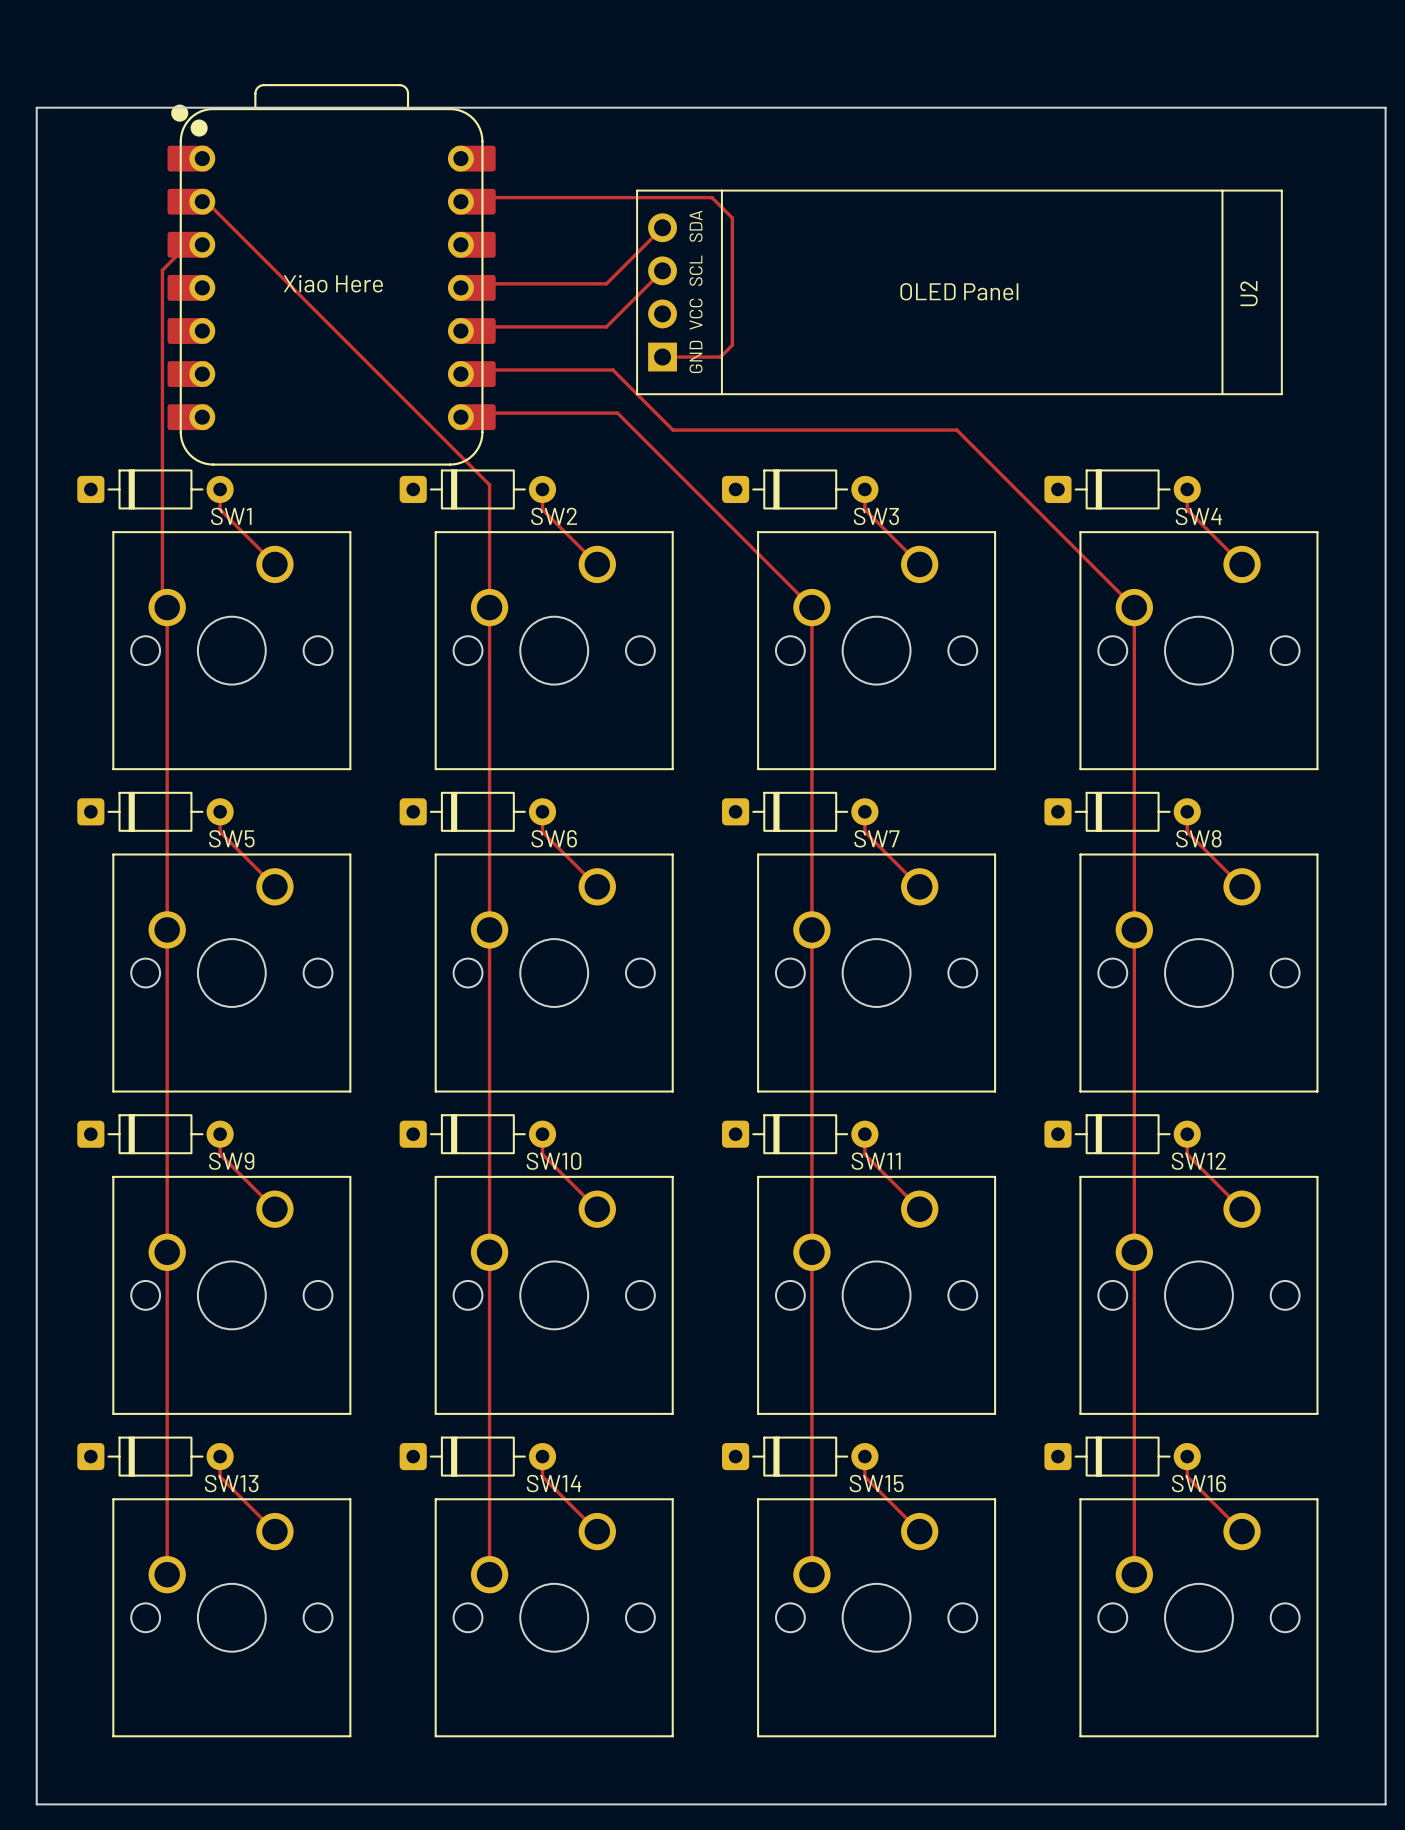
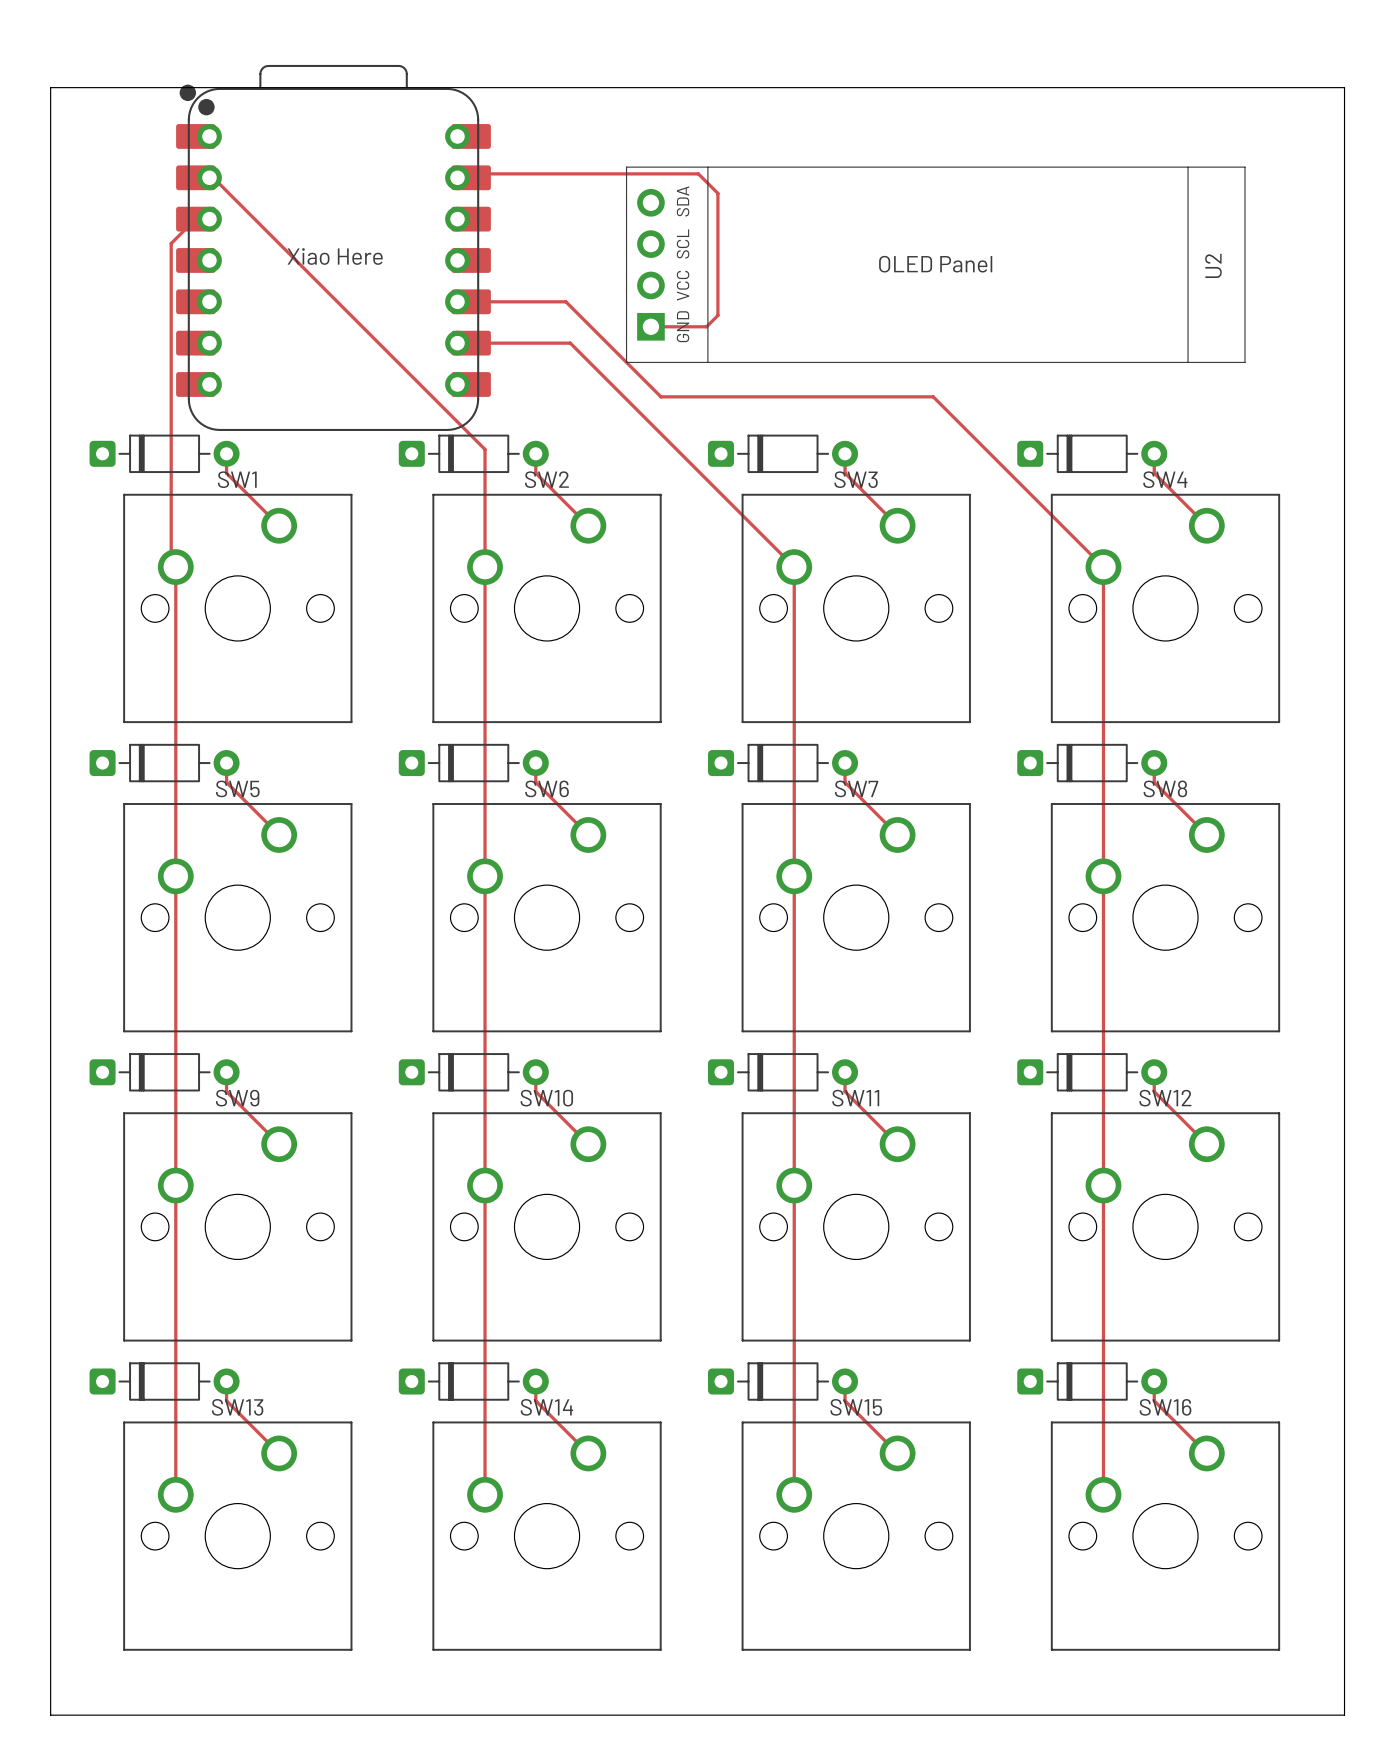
track: (662, 227) (606, 283) (487, 283) -> none
track: (662, 270) (606, 326) (460, 326) -> none
track: (460, 370) (612, 370) -> (457, 301) (565, 301) (603, 339)
track: (460, 413) (617, 413) -> (471, 343) (570, 343) (607, 380)

